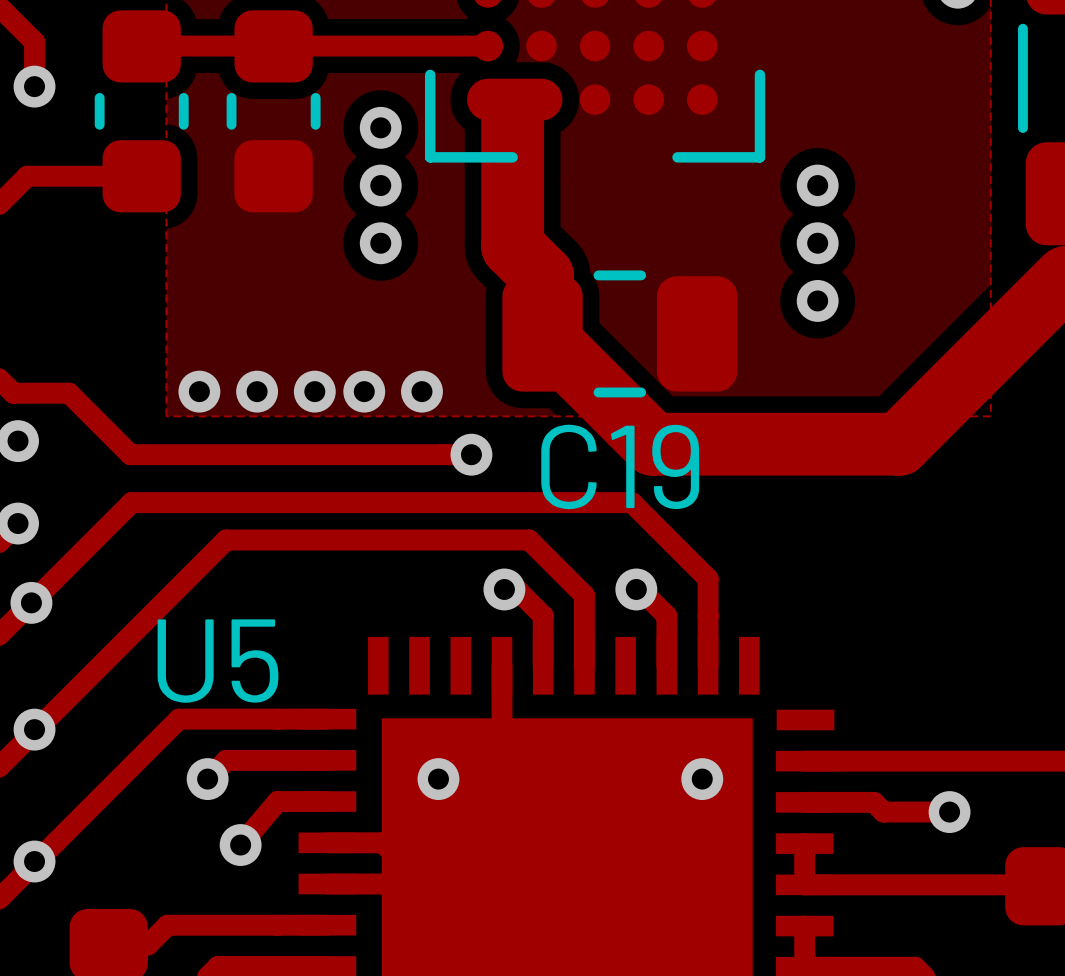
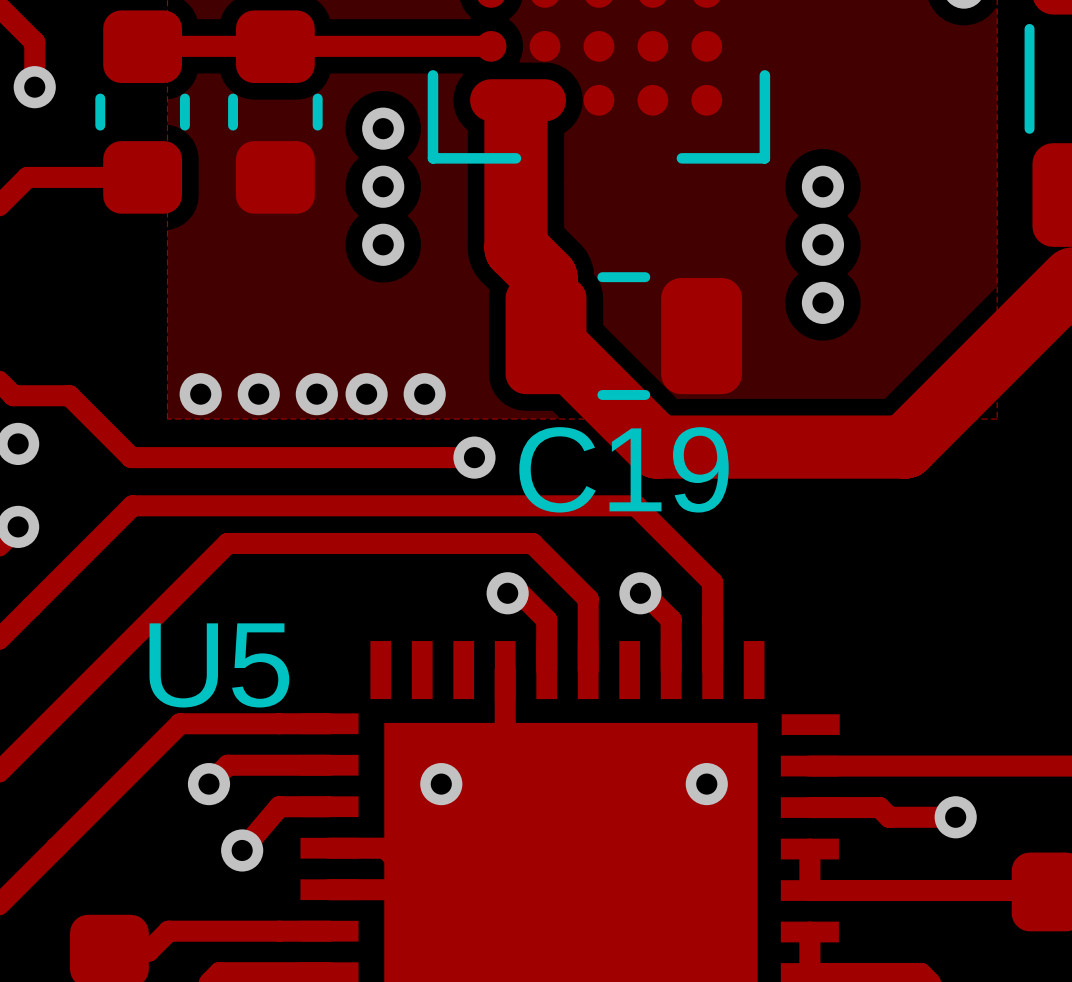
via: (31, 602) -> none
via: (34, 729) -> none
via: (34, 861) -> none

